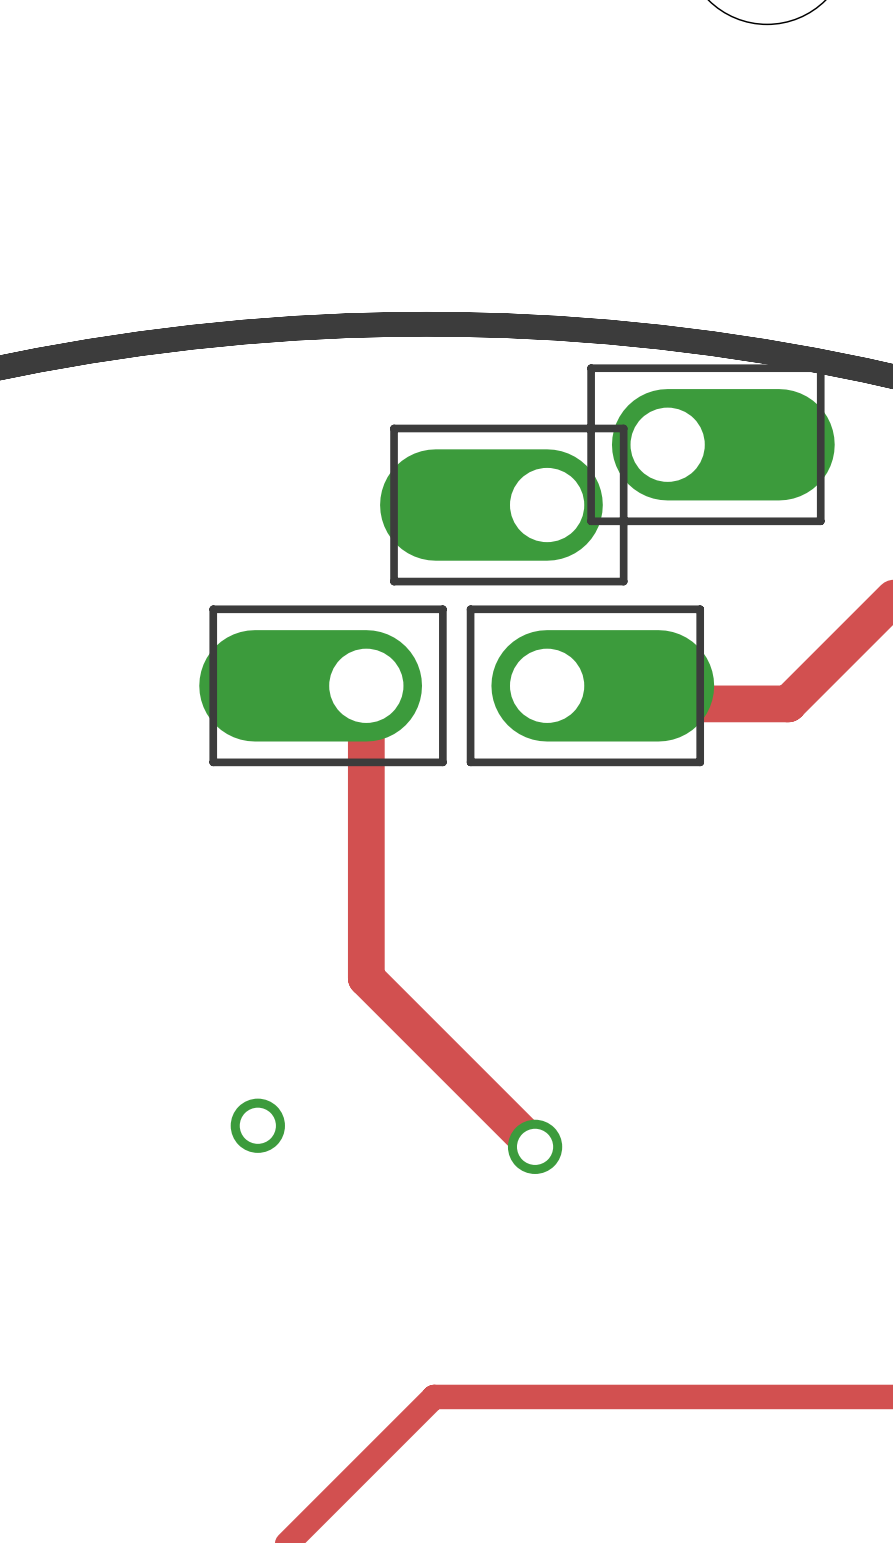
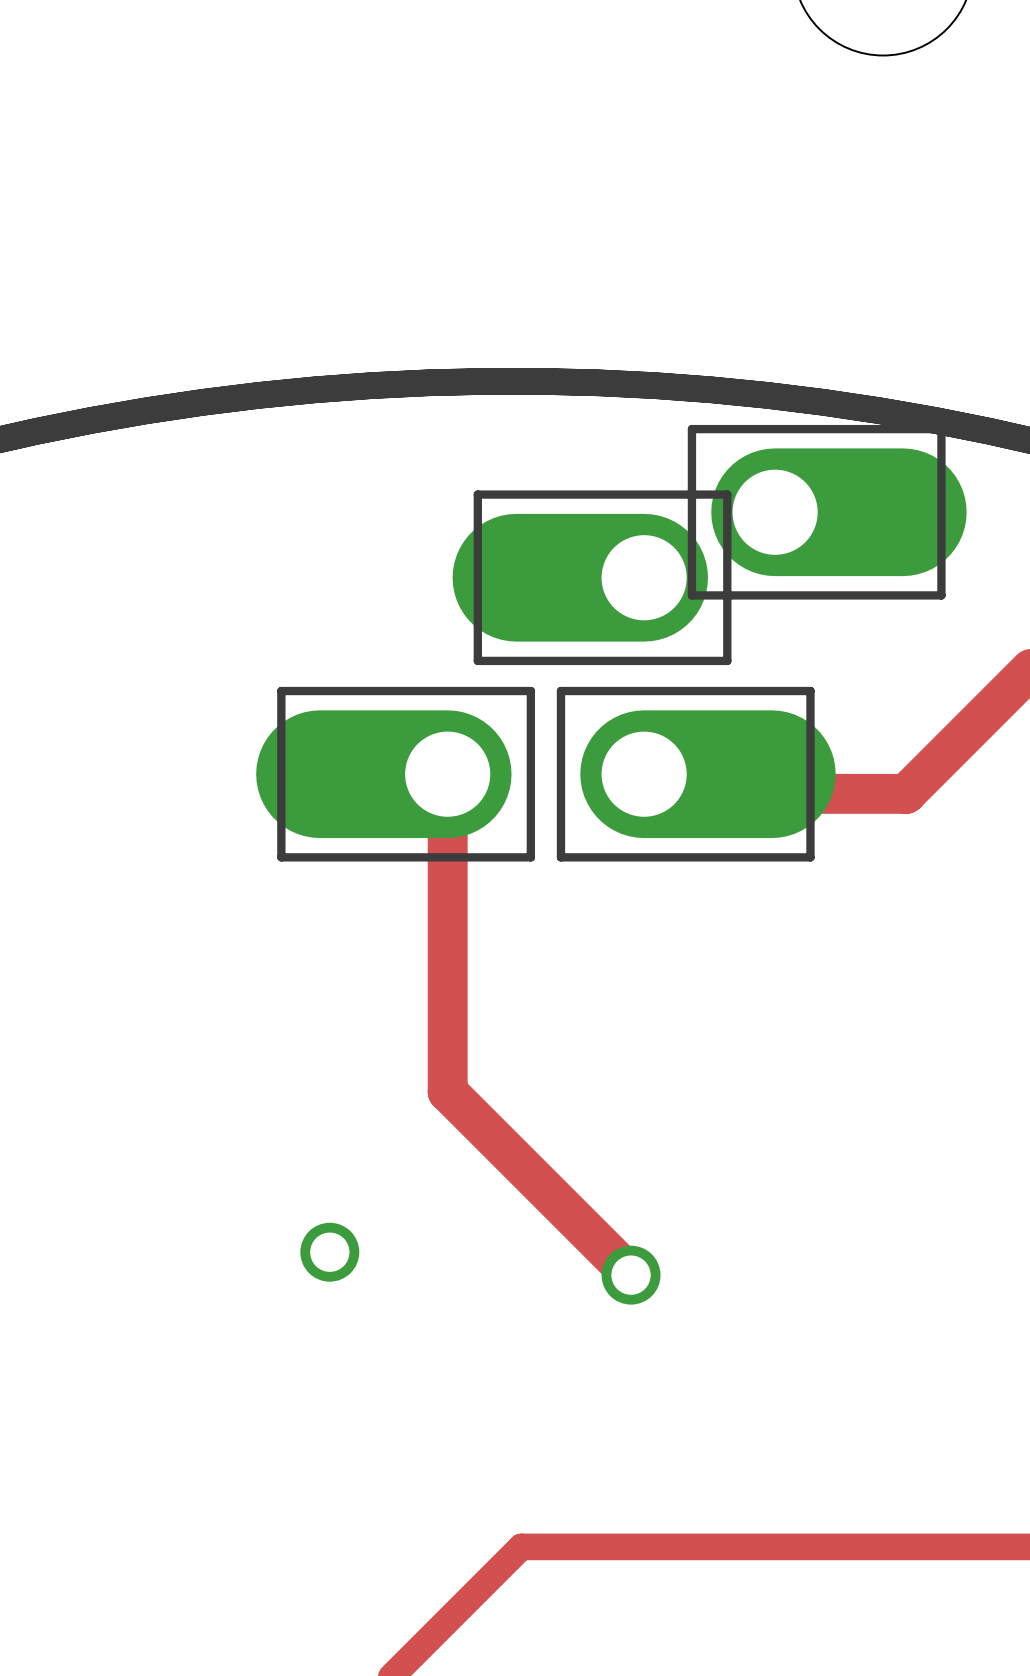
part footprint: [587, 364, 835, 526] -> [687, 424, 967, 600]
part footprint: [380, 424, 628, 586] -> [452, 490, 732, 666]
part footprint: [199, 605, 447, 767] -> [256, 686, 536, 862]
part footprint: [466, 605, 715, 767] -> [556, 686, 836, 862]

